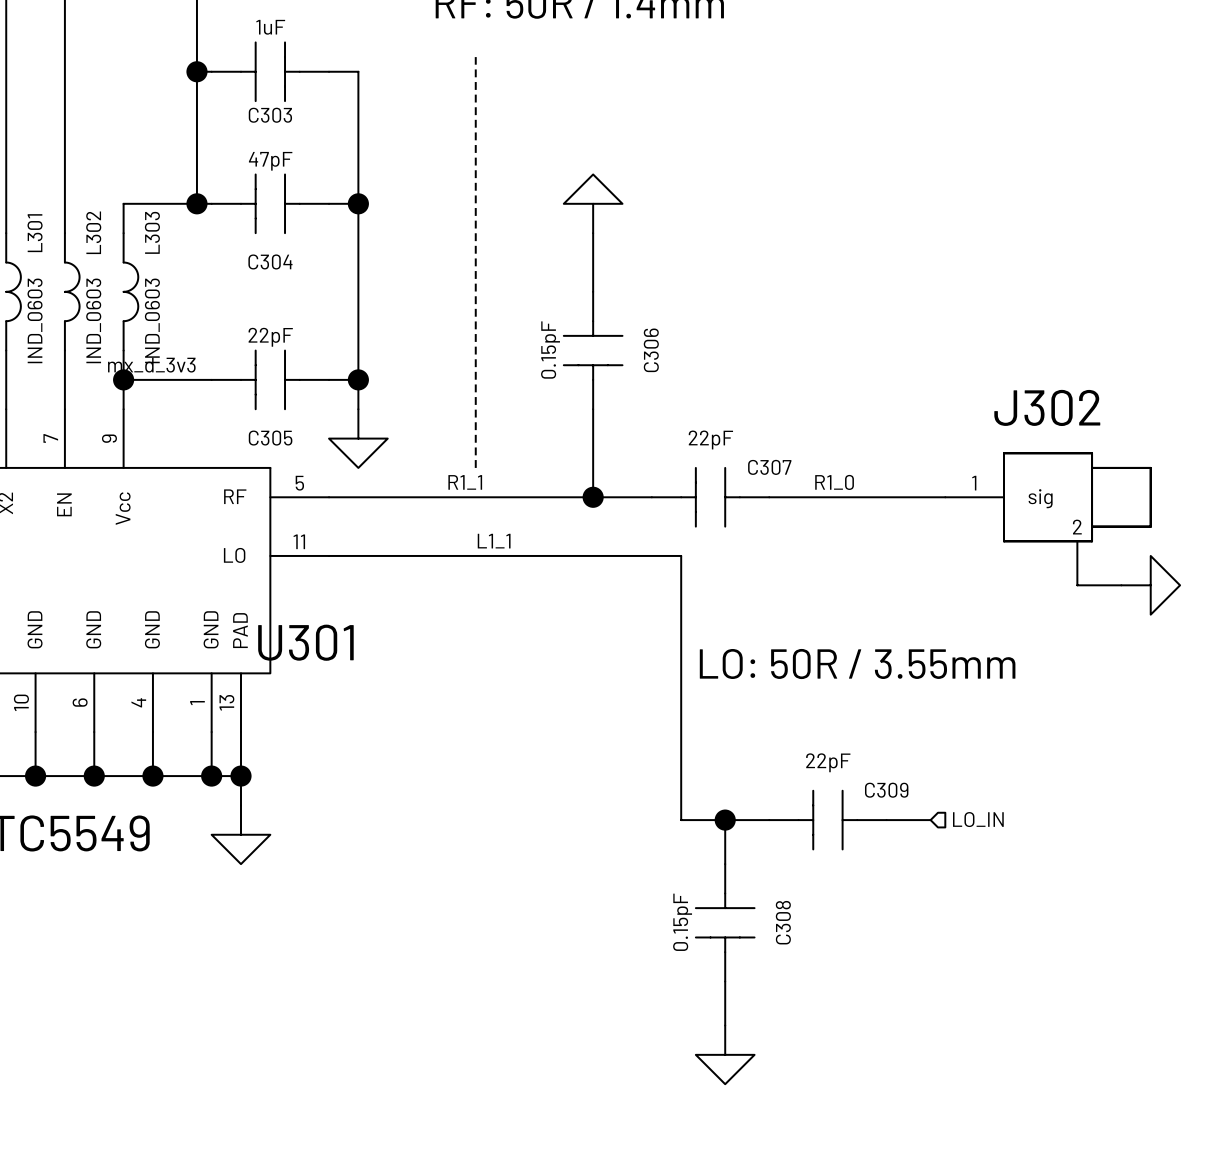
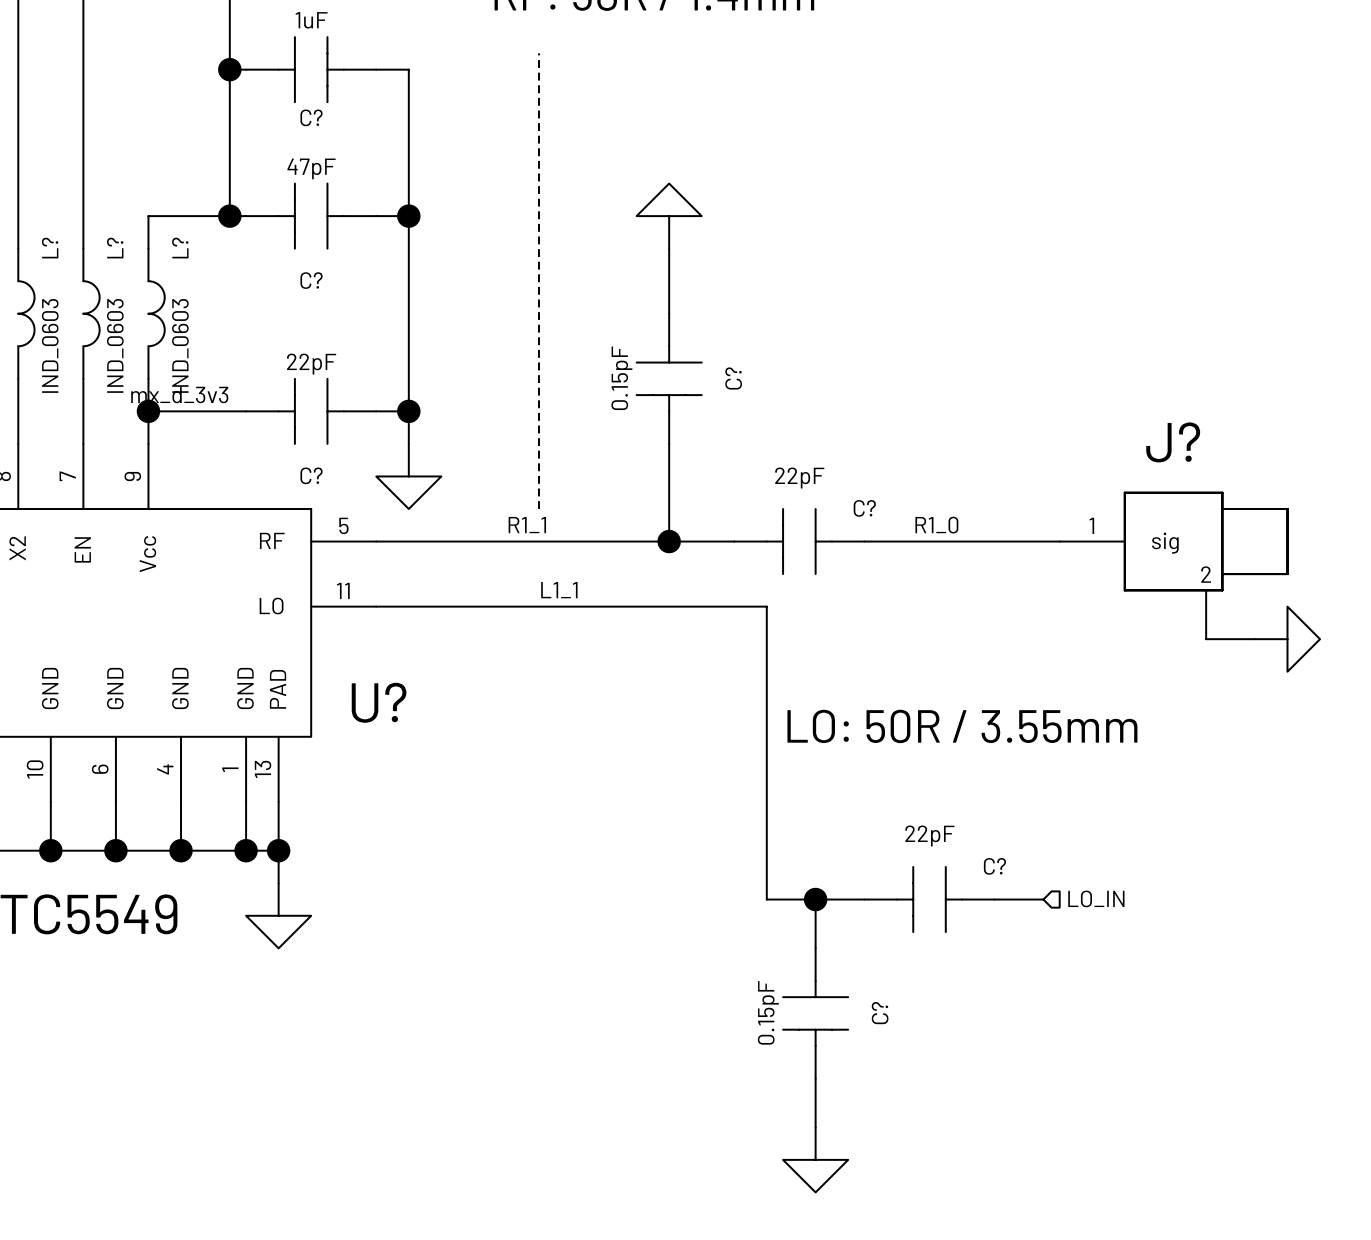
C303 name: C303 (270, 115) -> C? (311, 117)
L302 name: L302 (93, 232) -> L? (115, 248)
L303 name: L303 (152, 232) -> L? (180, 248)
L301 name: L301 (35, 233) -> L? (50, 248)
C304 name: C304 (270, 261) -> C? (311, 280)
C306 name: C306 (651, 350) -> C? (733, 378)
J302 name: J302 (1047, 407) -> J? (1173, 442)
C305 name: C305 (270, 438) -> C? (311, 475)
C307 name: C307 (769, 467) -> C? (864, 508)
U301 name: U301 (305, 642) -> U? (379, 702)
C309 name: C309 (886, 790) -> C? (994, 866)
C308 name: C308 (783, 922) -> C? (880, 1013)

